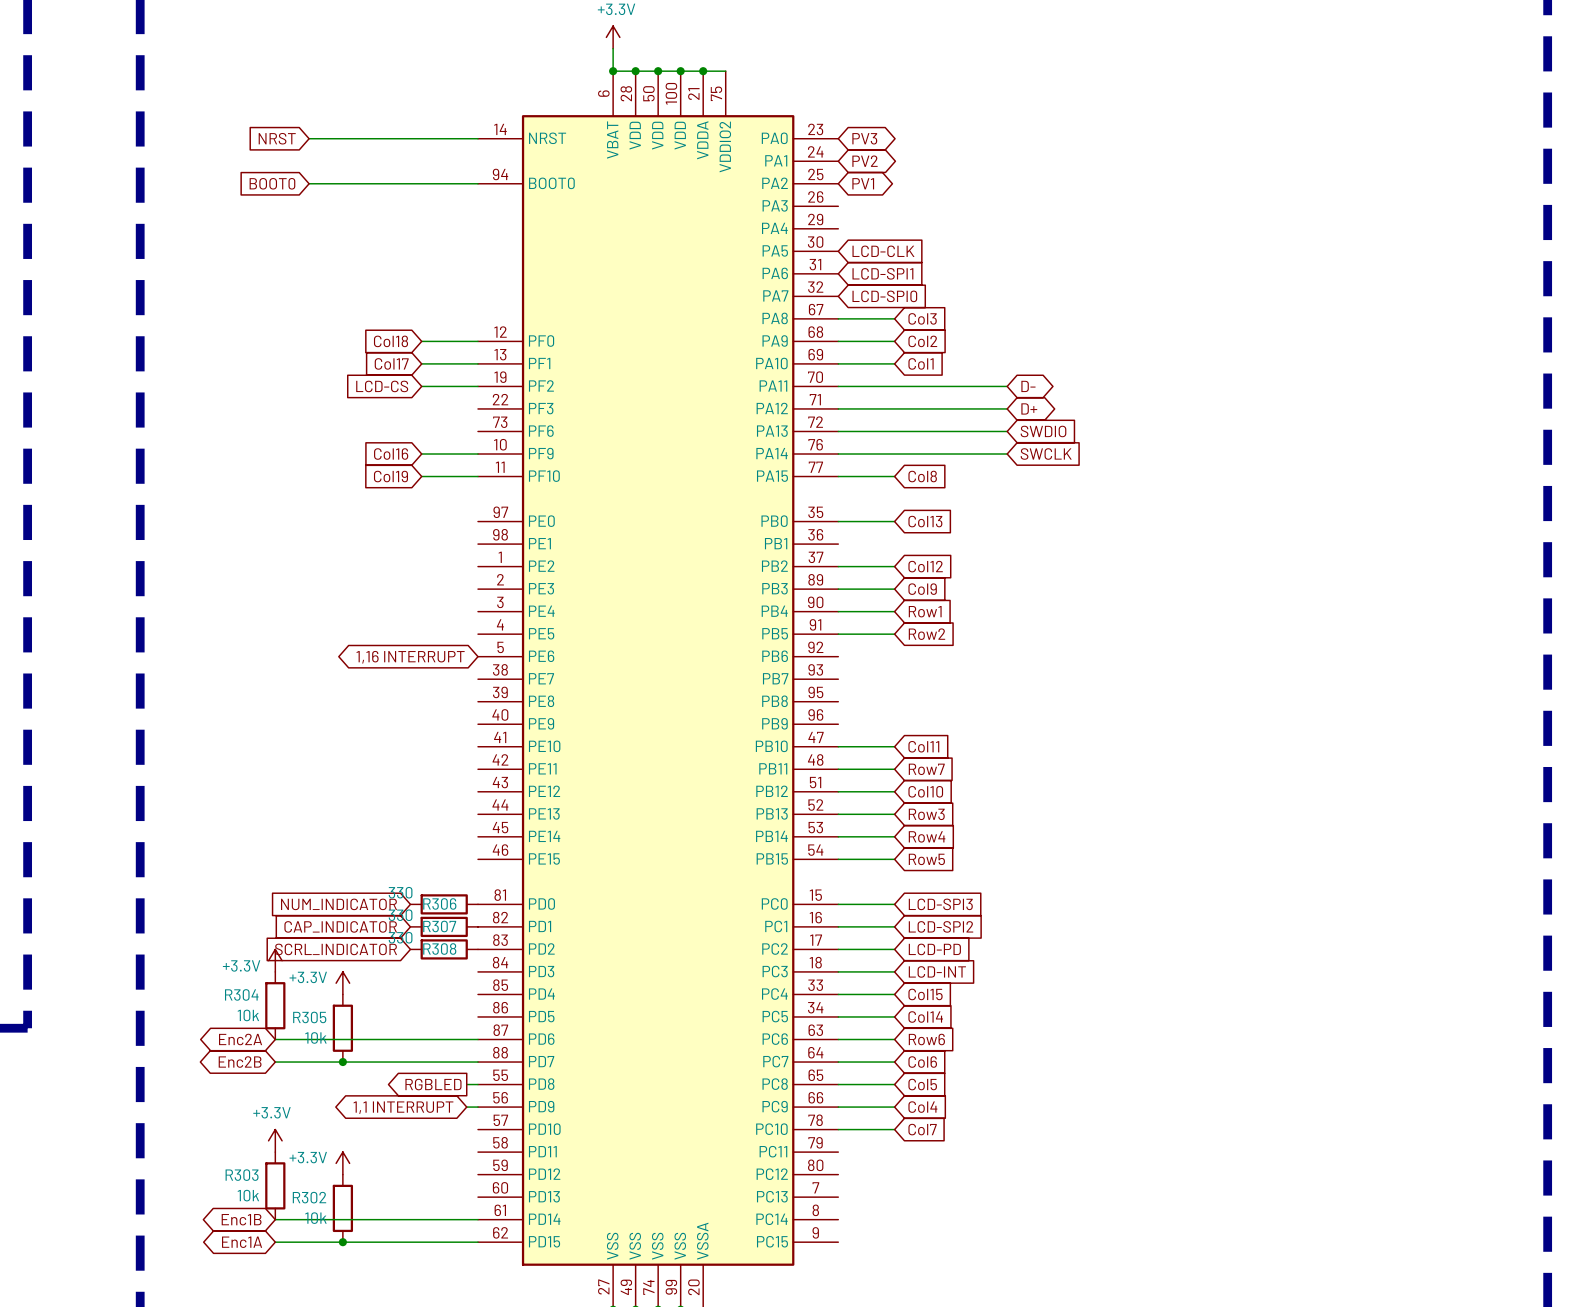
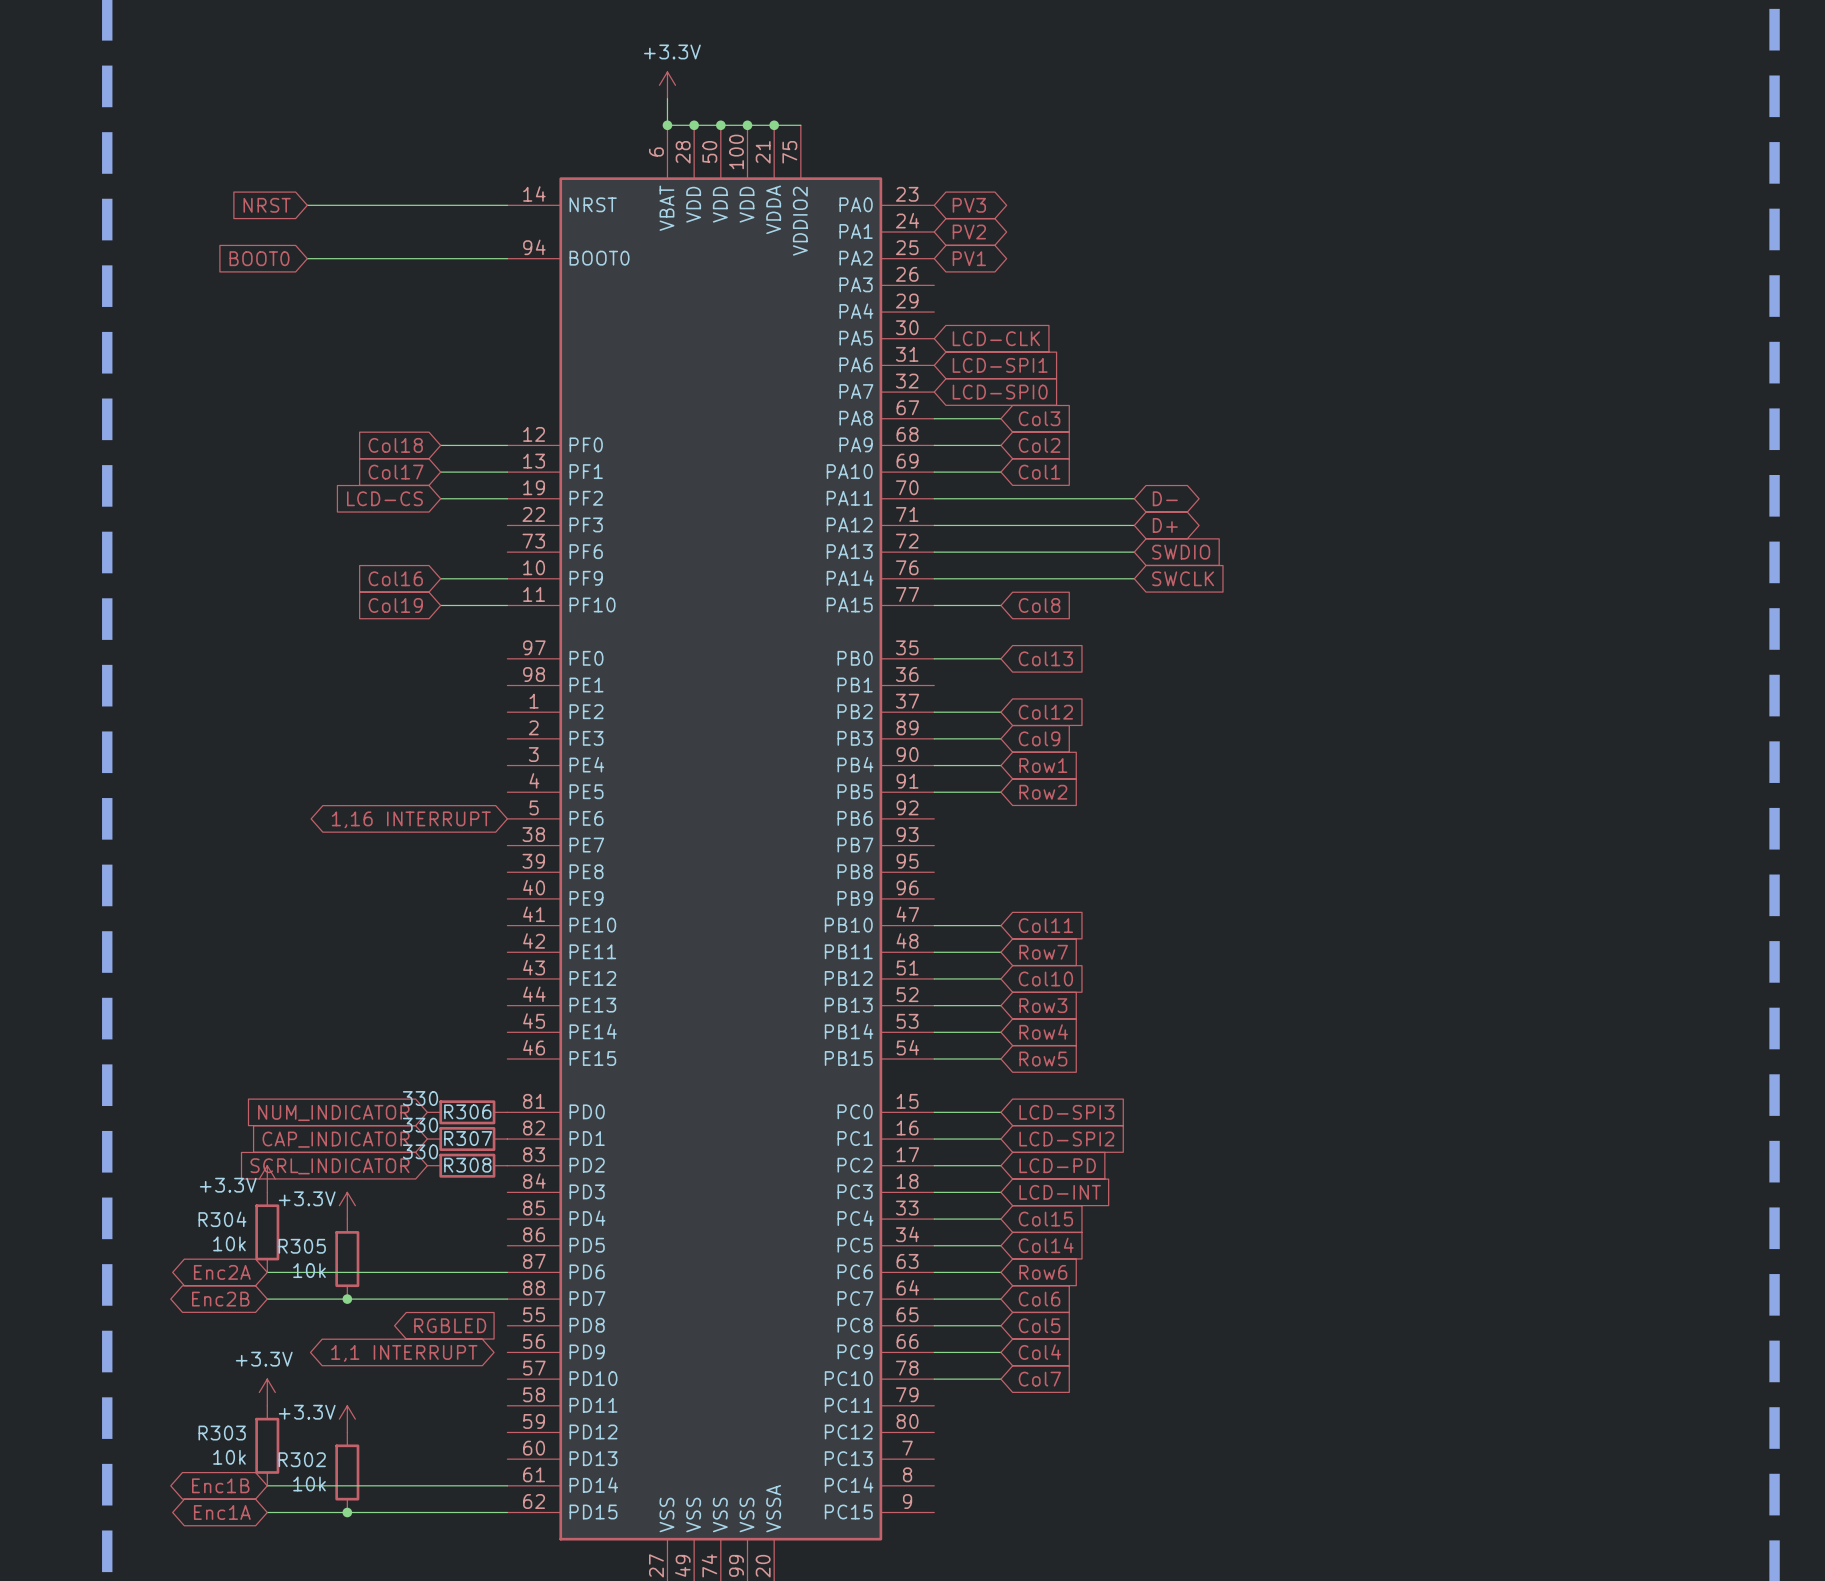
wire: (466, 1084) (478, 1084) -> none
wire: (466, 1107) (478, 1107) -> none

